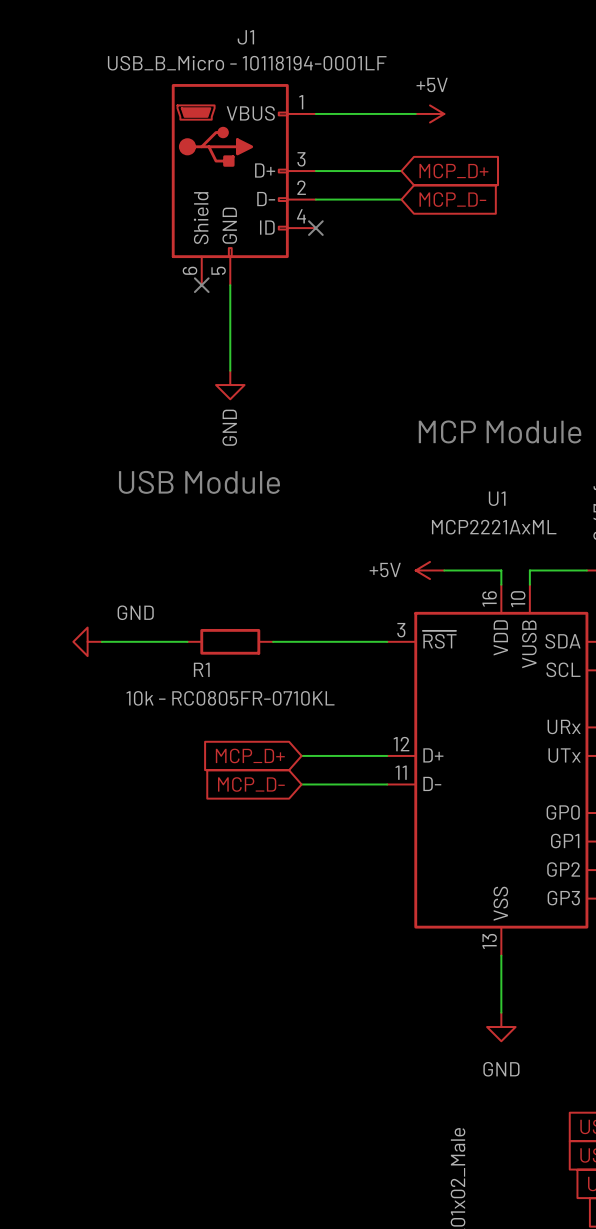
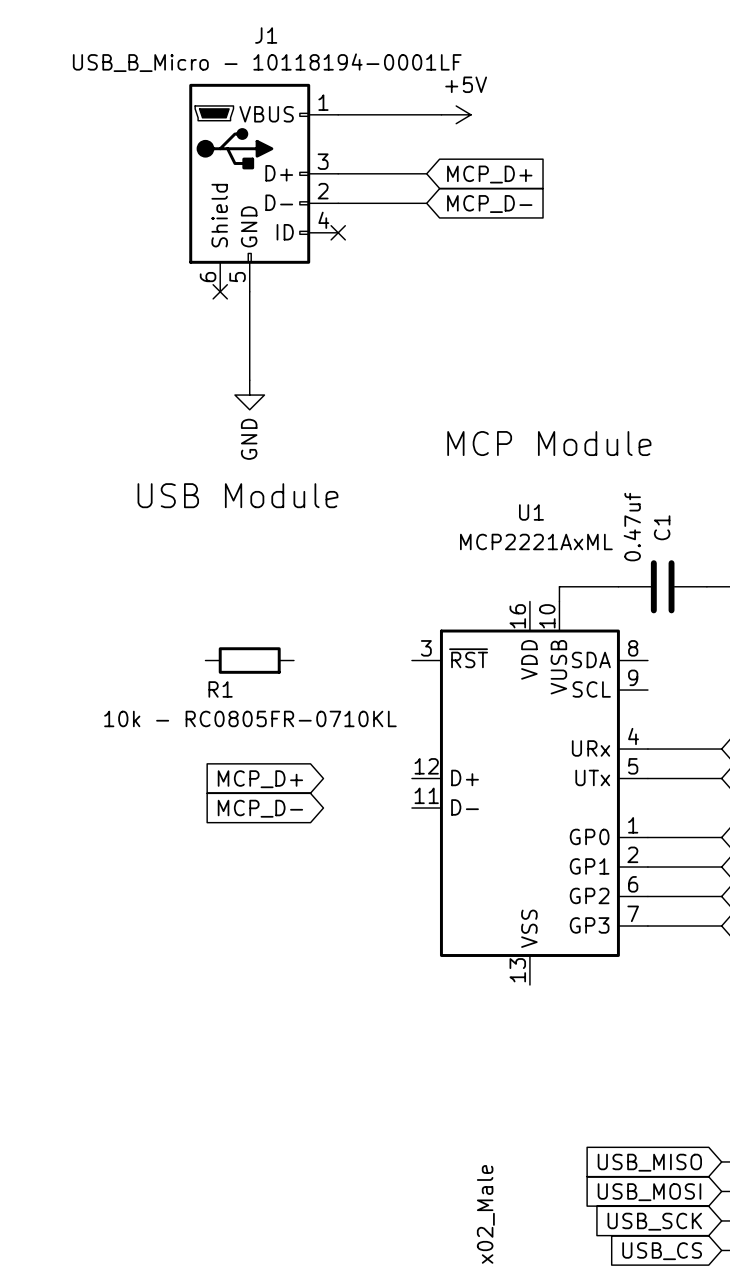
power symbol: +5V (430, 570) -> none
wire: (444, 570) (501, 570) (501, 584) -> none
power symbol: GND (87, 641) -> none
wire: (101, 641) (187, 641) -> none
wire: (273, 641) (387, 641) -> none
wire: (301, 755) (387, 755) -> none
wire: (301, 784) (387, 784) -> none
wire: (501, 955) (501, 1012) -> none
power symbol: GND (501, 1027) -> none

